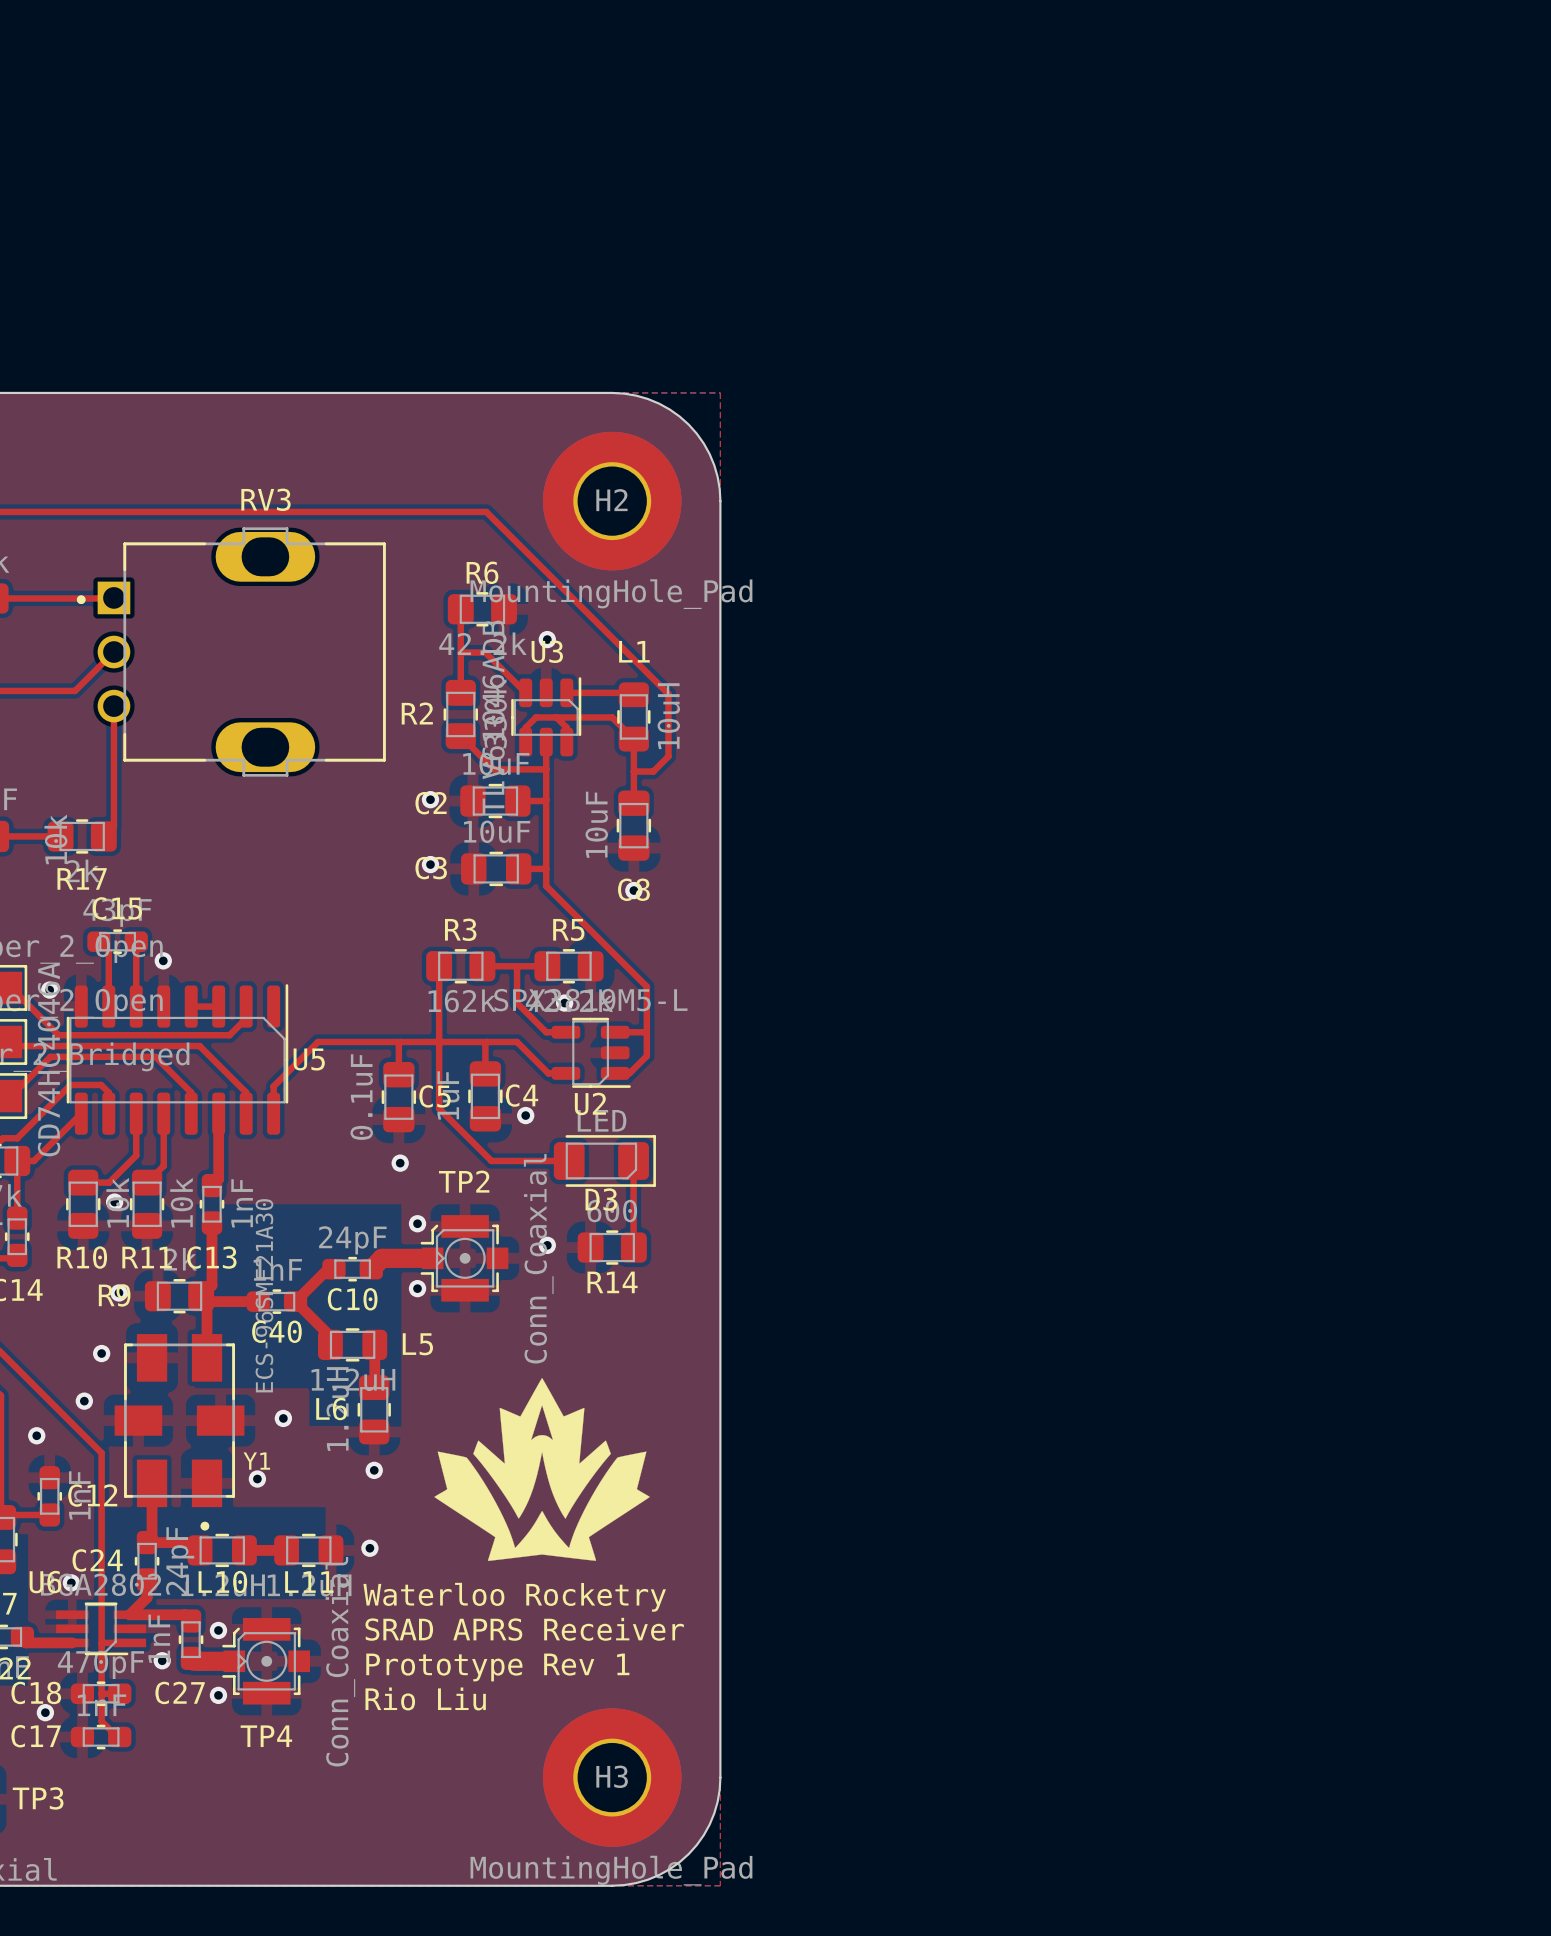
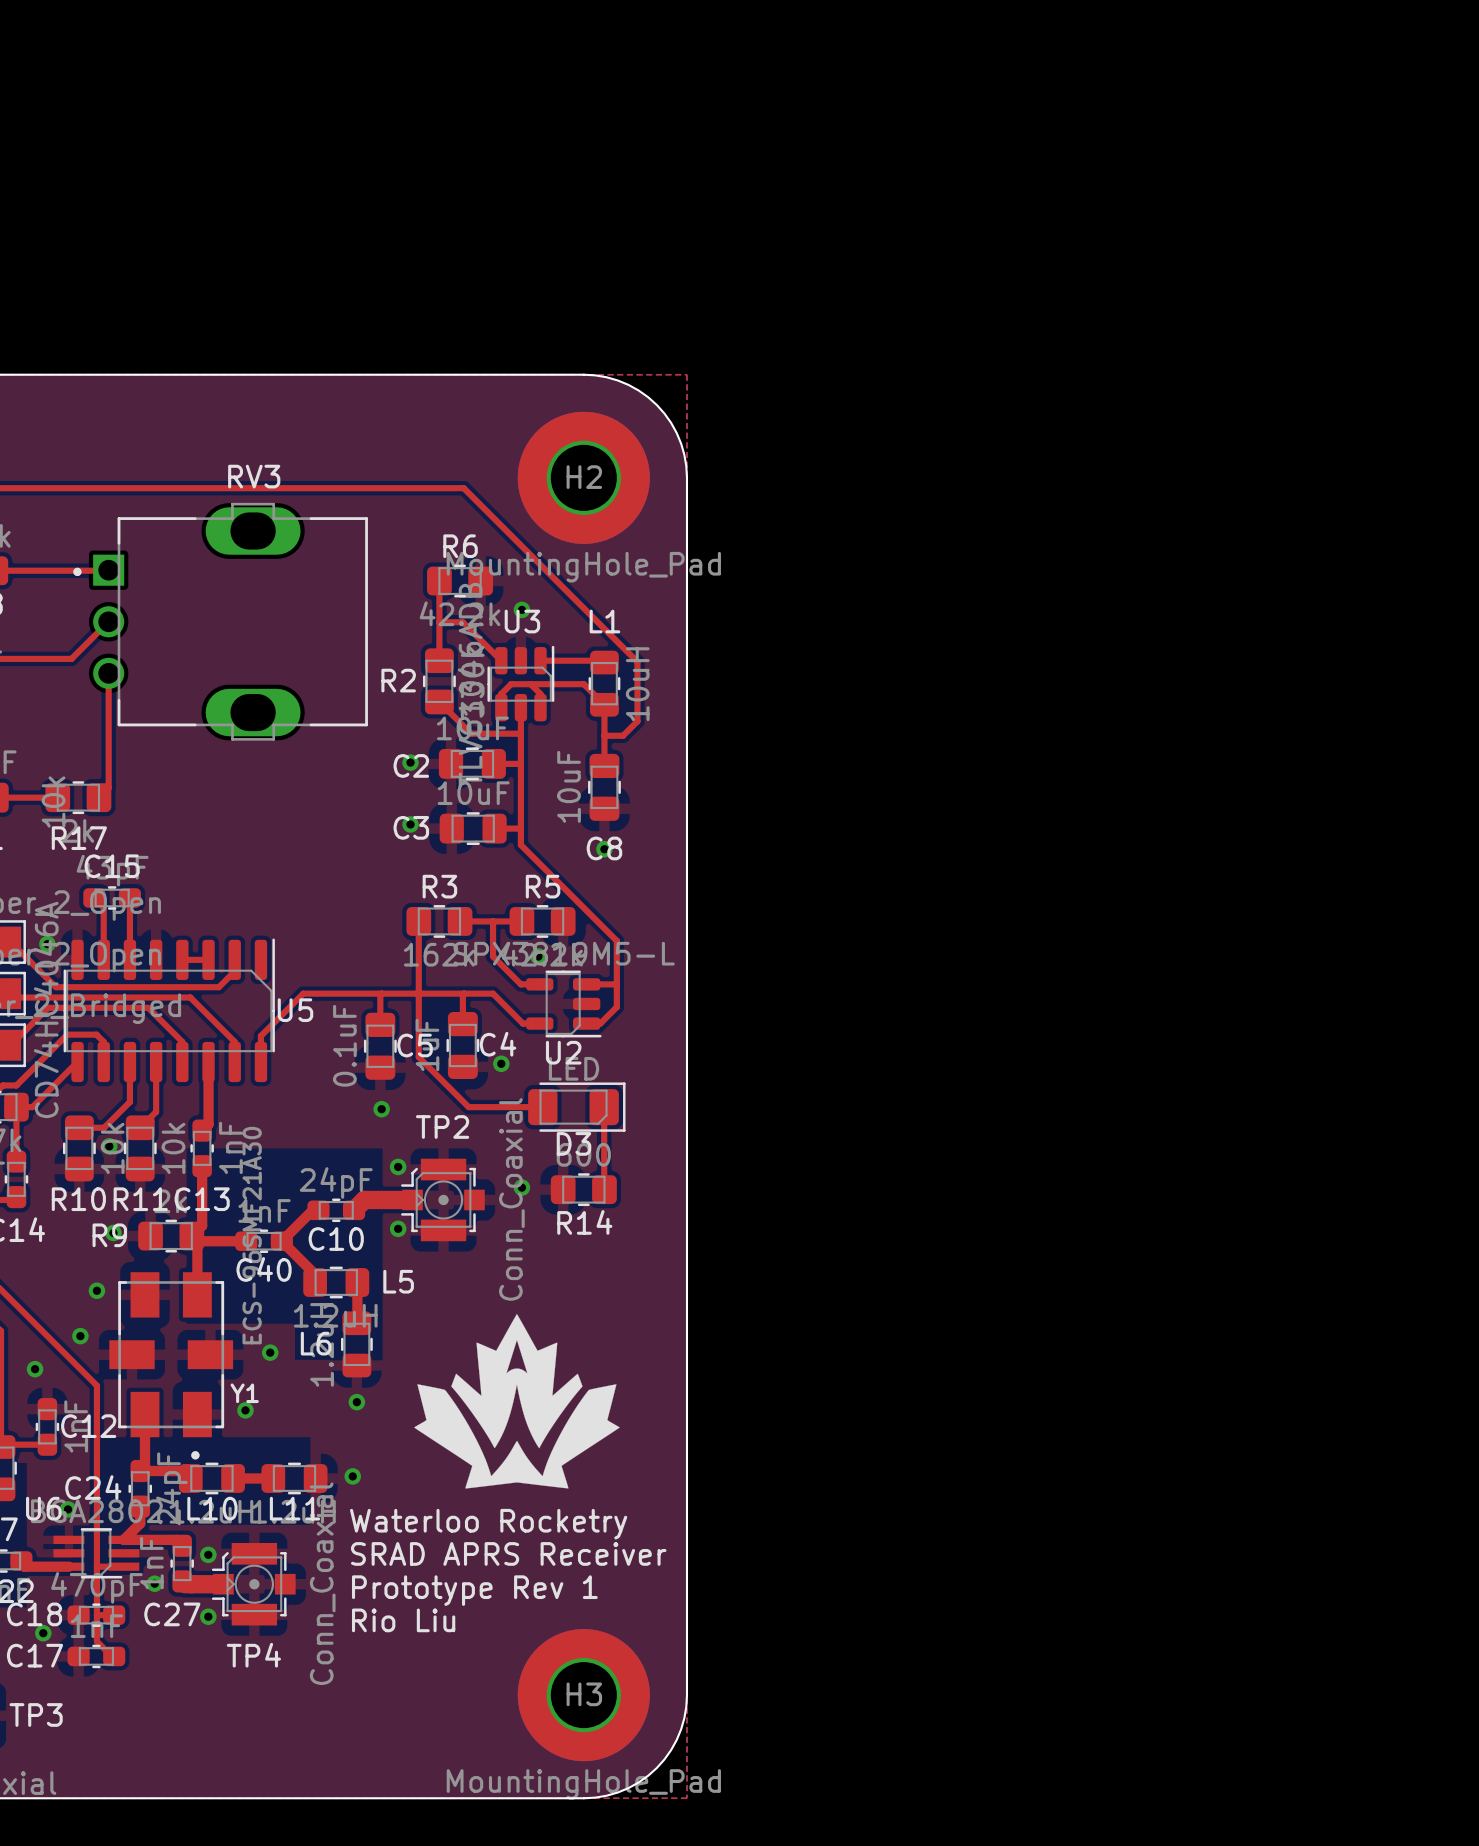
via: (163, 960) -> none

